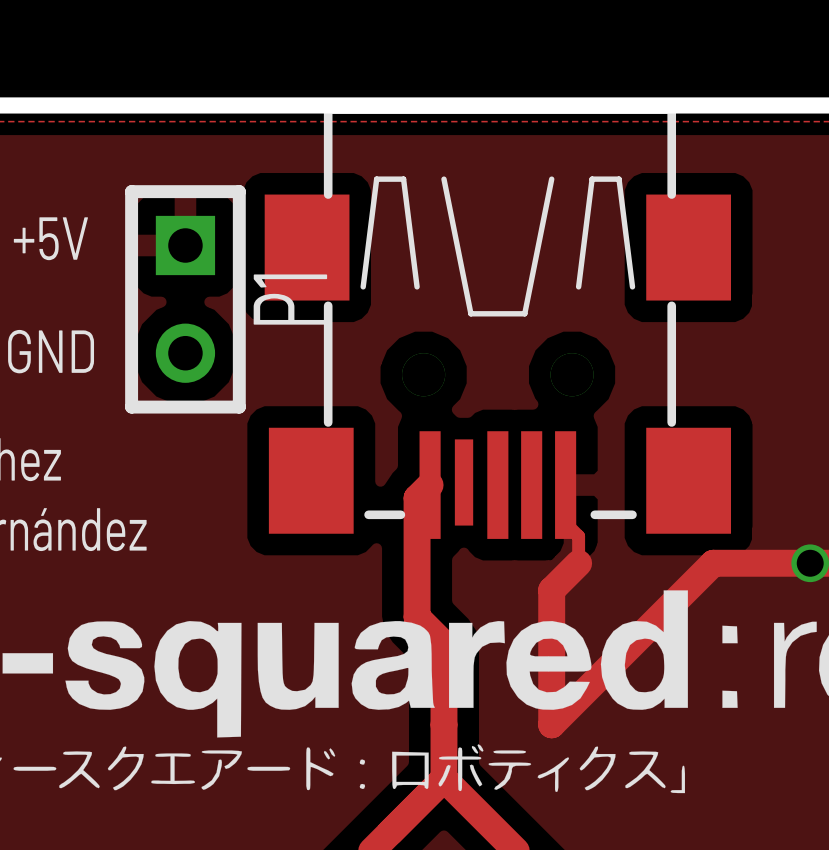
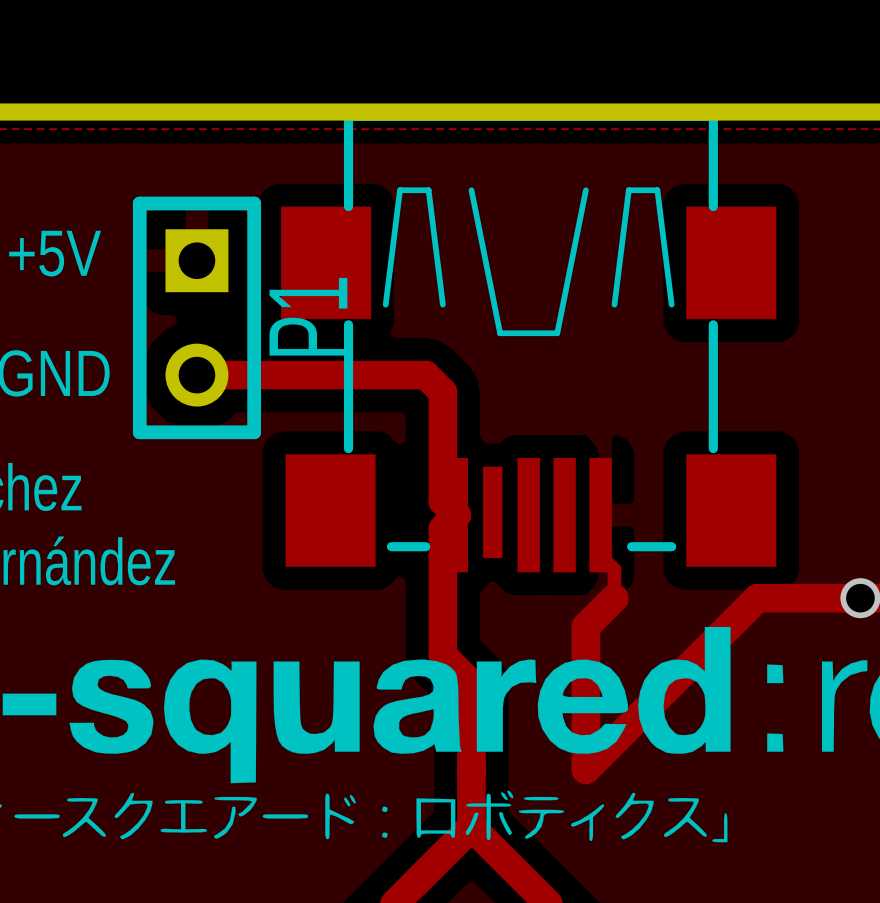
part footprint: [264, 105, 732, 539] -> [281, 111, 777, 573]
track: none -> (196, 375) (425, 375) (442, 392) (442, 501) (456, 515)

